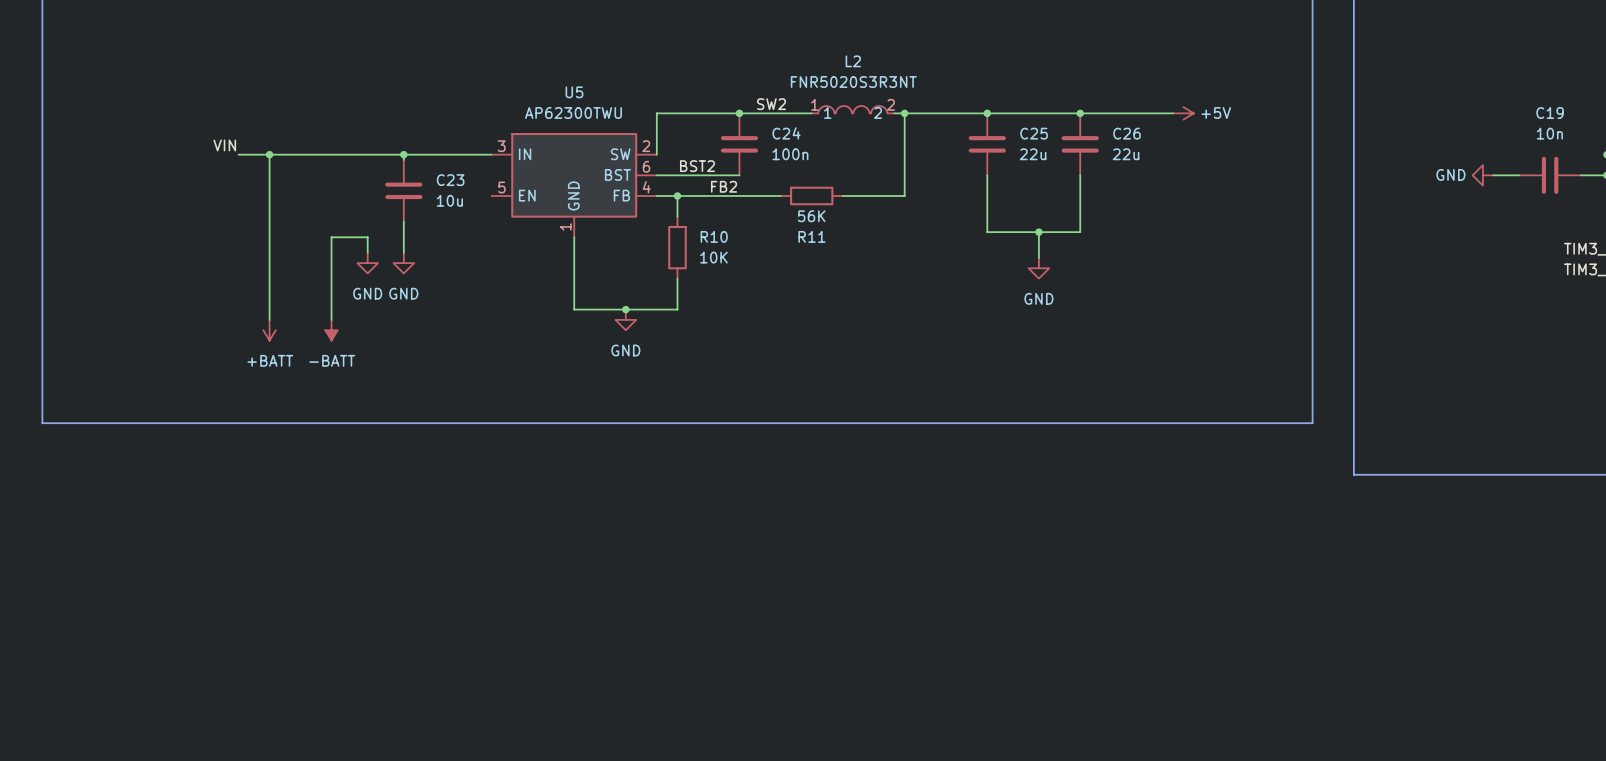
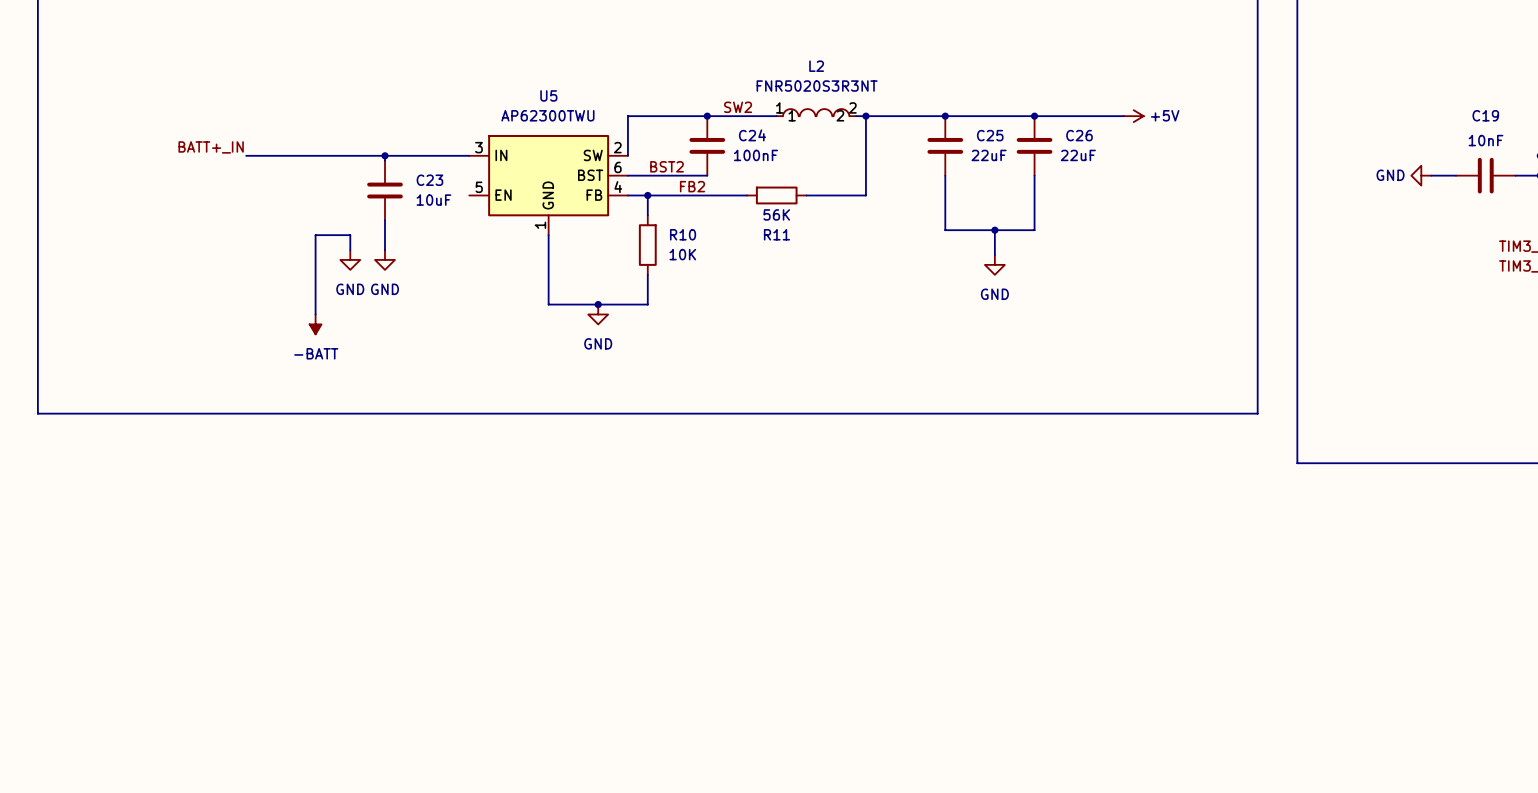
C19 value: 10n (1549, 133) -> 10nF (1486, 140)
label: none -> BATT+_IN (211, 147)
label: VIN (224, 145) -> none
wire: (238, 154) (259, 154) -> none
wire: (269, 154) (269, 319) -> none
junction: (269, 154) -> none
C24 value: 100n (790, 154) -> 100nF (756, 155)
C25 value: 22u (1033, 154) -> 22uF (989, 155)
C26 value: 22u (1126, 154) -> 22uF (1078, 155)
C23 value: 10u (449, 200) -> 10uF (433, 200)
power symbol: +BATT (269, 330) -> none

